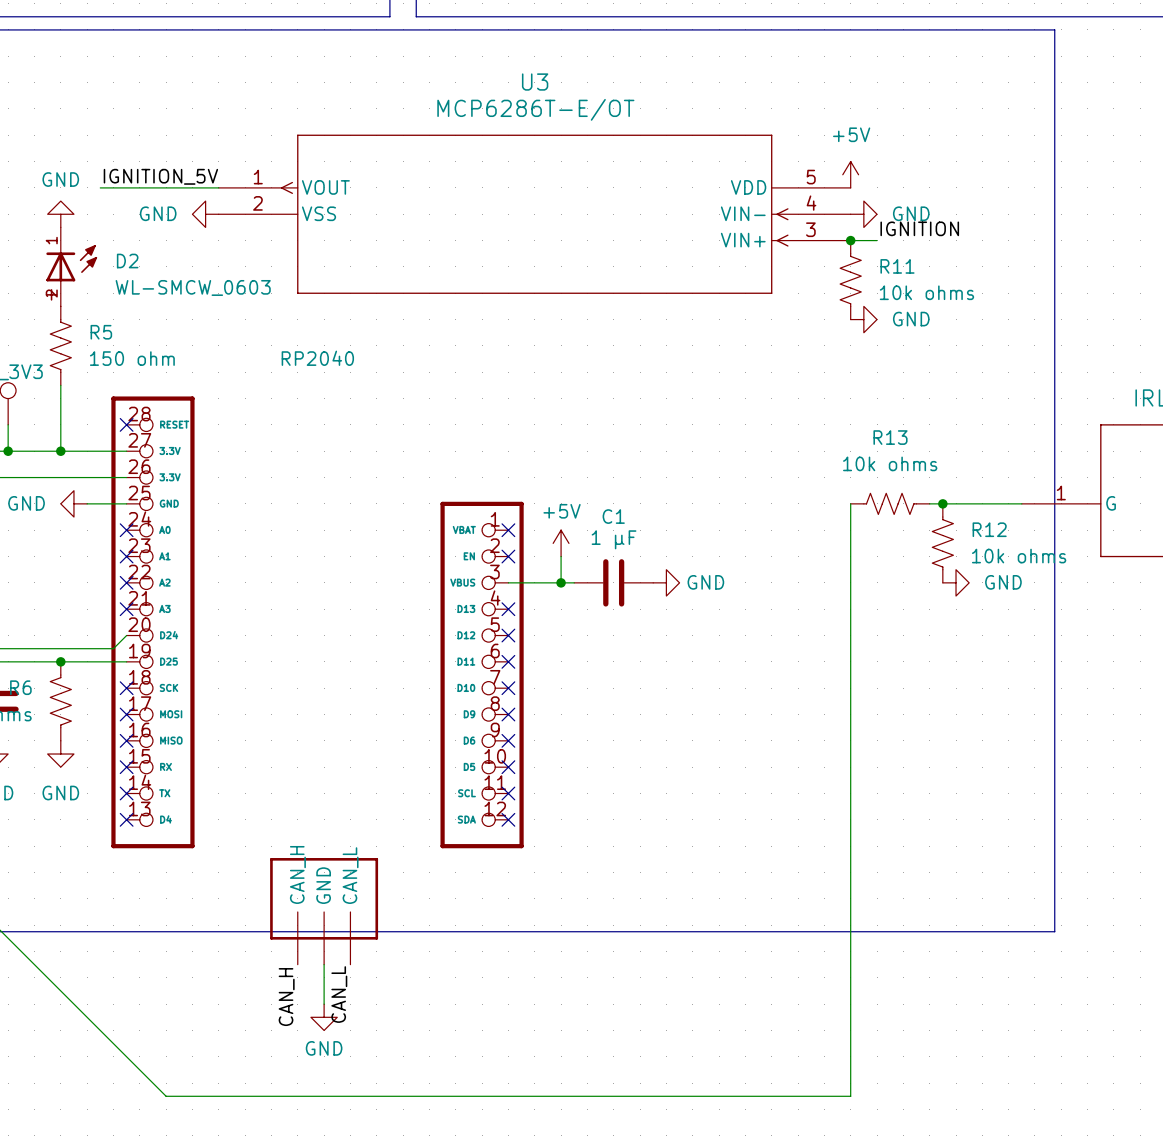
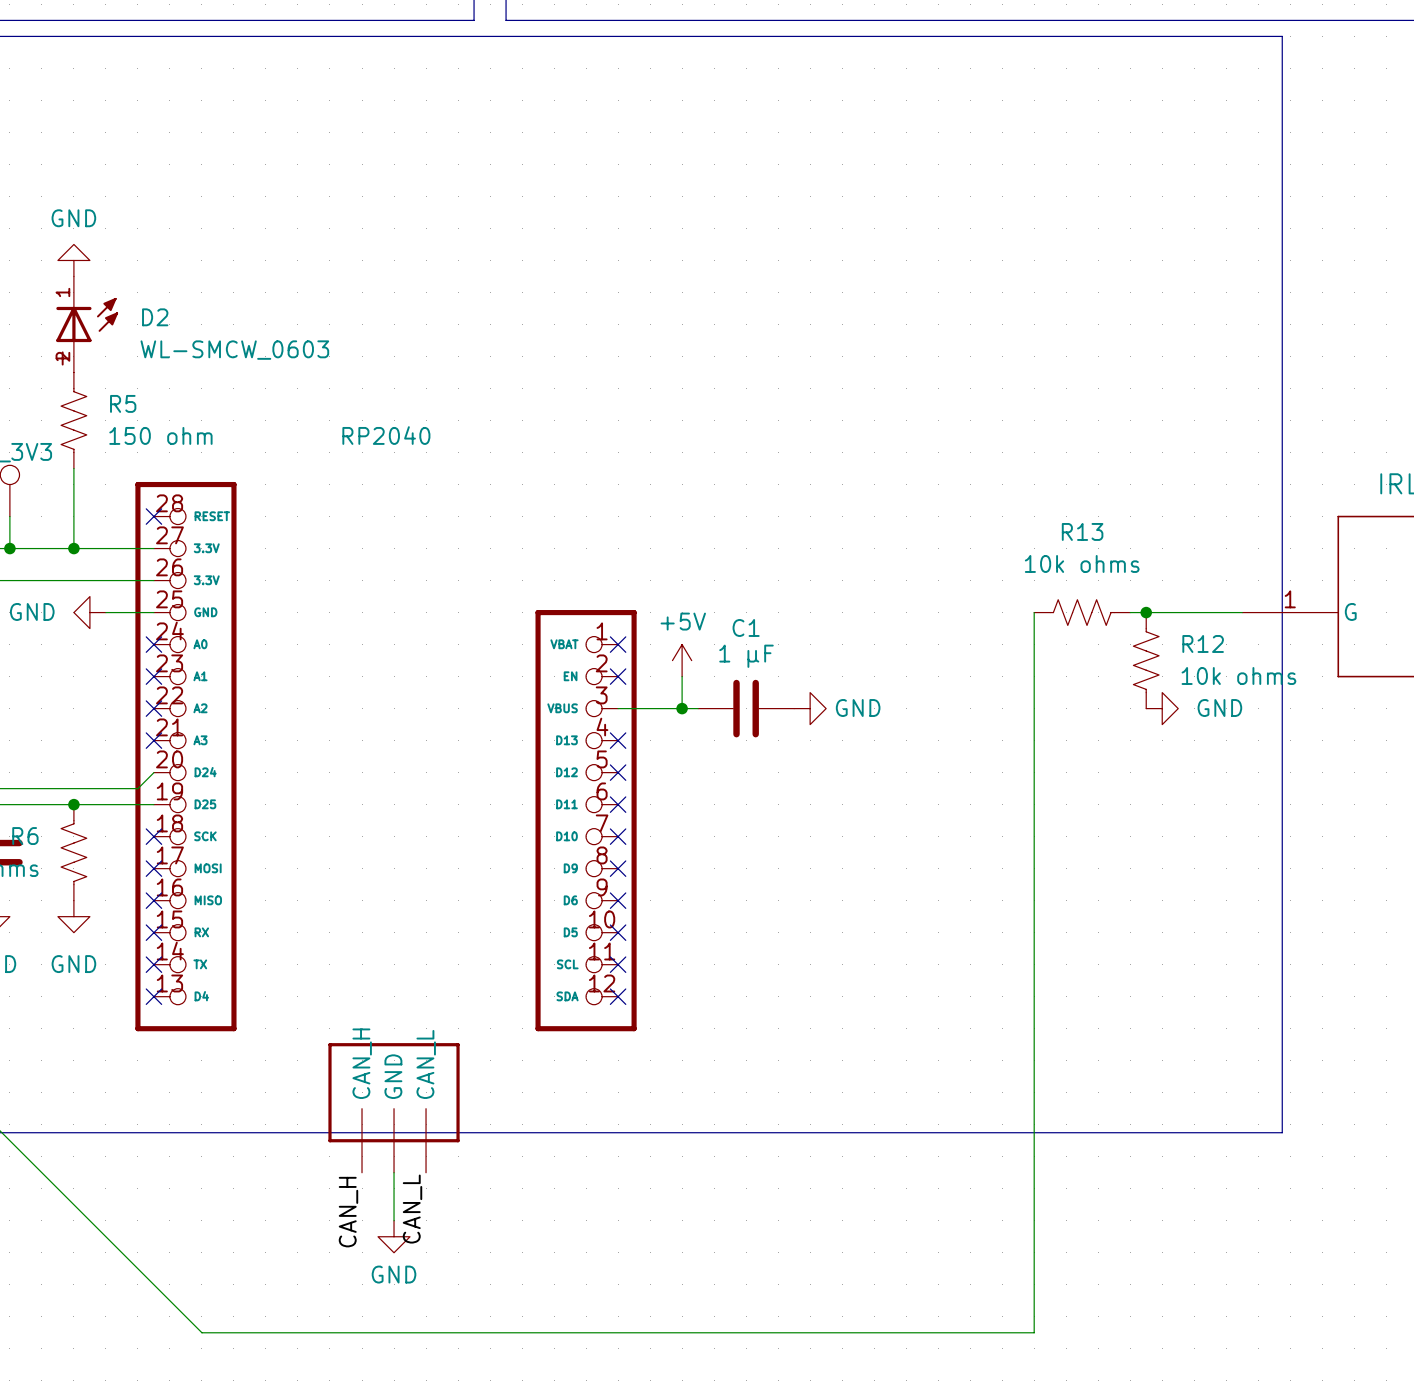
power symbol: +5V (850, 174) -> none
label: IGNITION_5V (160, 176) -> none
wire: (100, 187) (218, 187) -> none
power symbol: GND (205, 214) -> none
U3: MCP6286T-E/OT (534, 214) -> none
power symbol: GND (863, 214) -> none
label: IGNITION (919, 228) -> none
wire: (850, 240) (877, 240) -> none
junction: (850, 240) -> none
R11: 10k ohms (850, 280) -> none
power symbol: GND (863, 319) -> none

